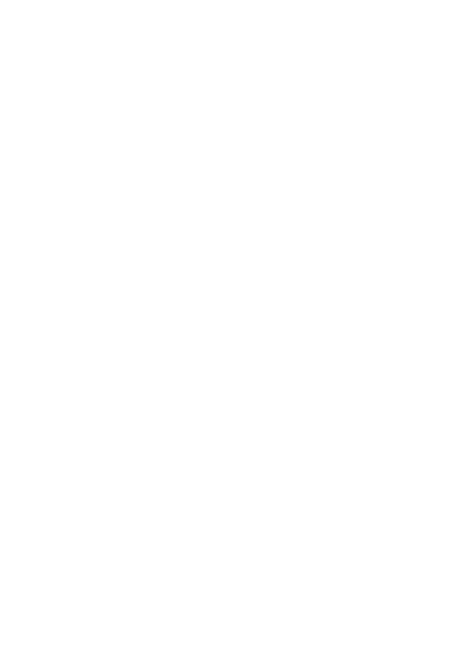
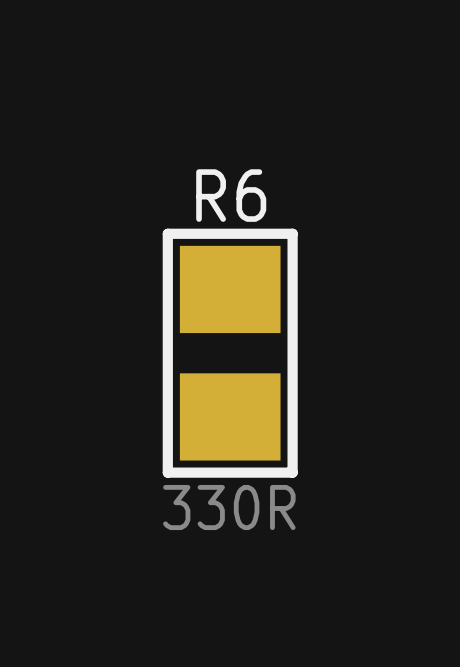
R6: none -> 330R (230, 353)

